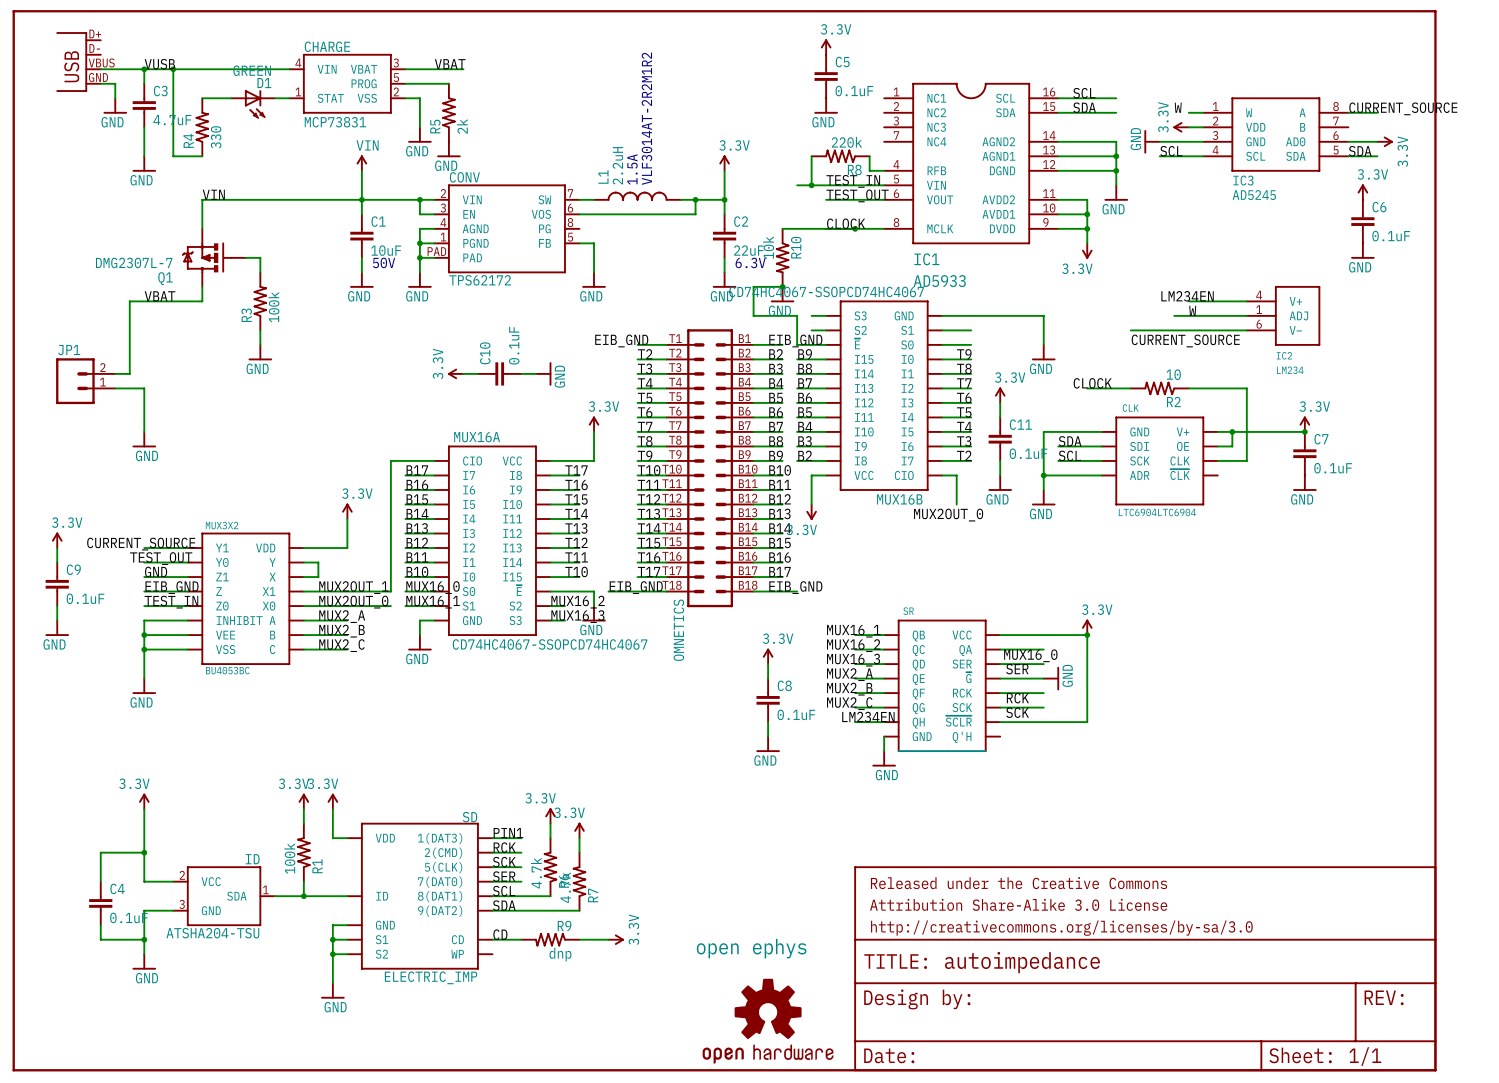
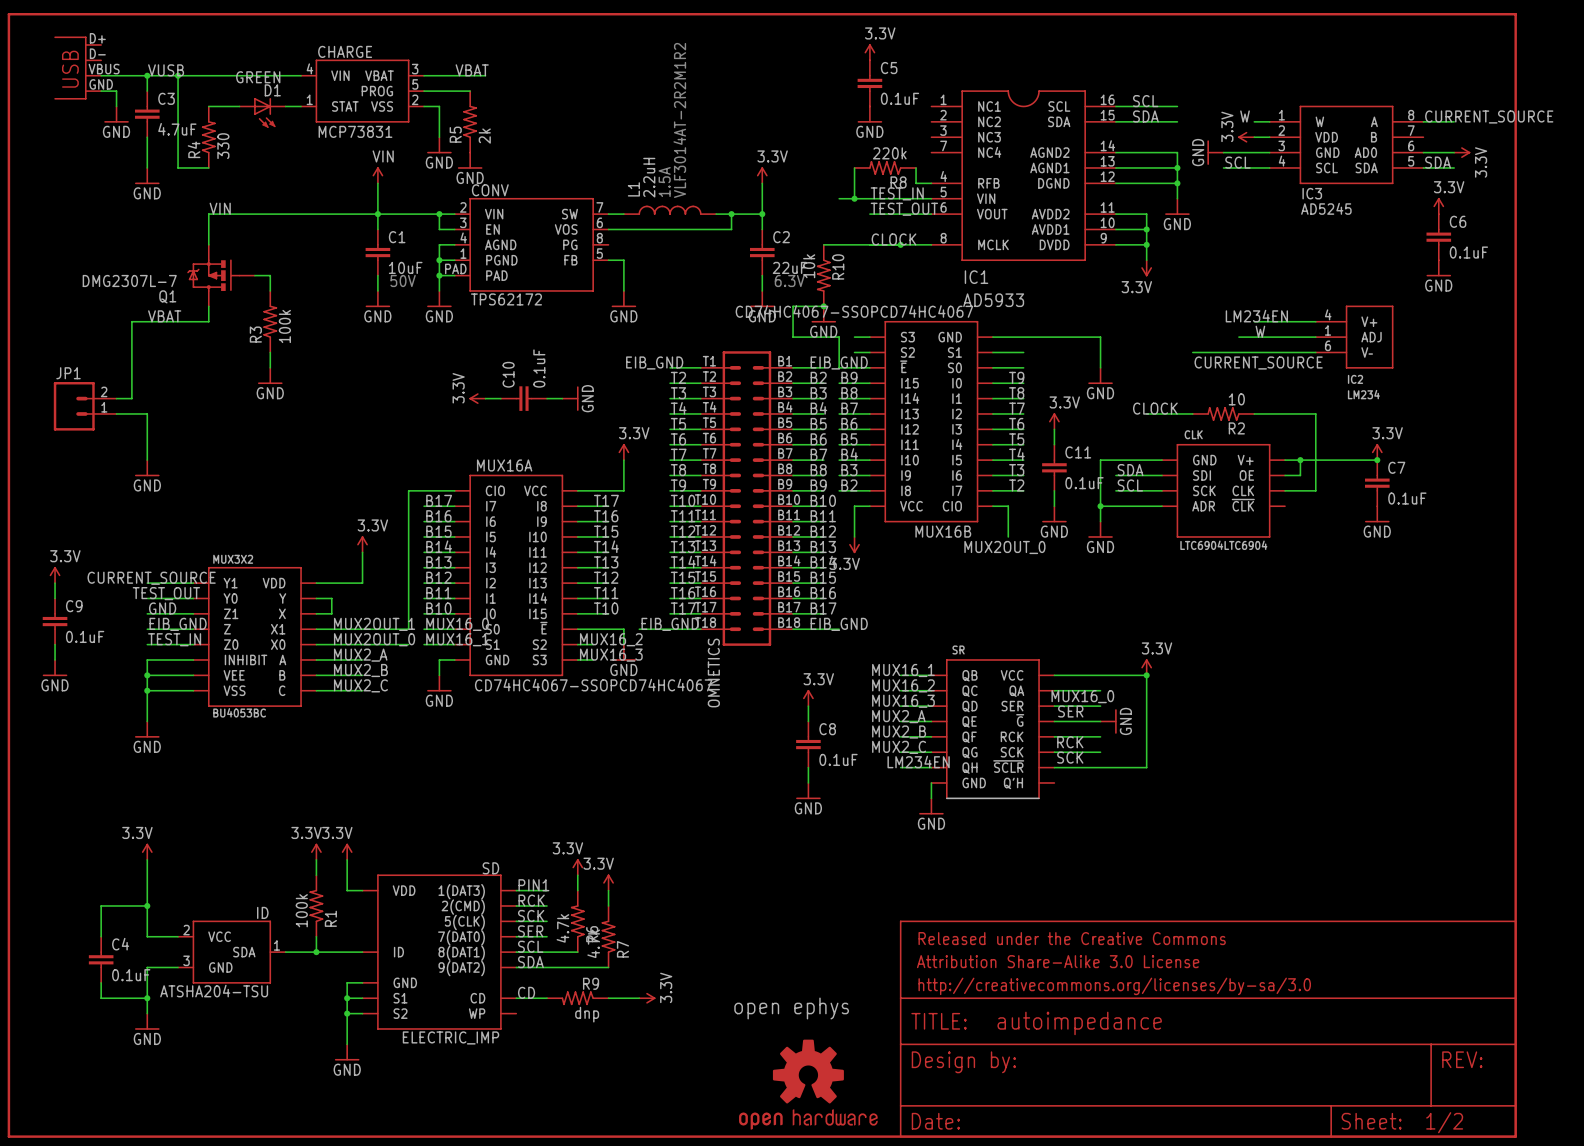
part text: 1/1 (1365, 1056) -> 1/2 (1444, 1122)

